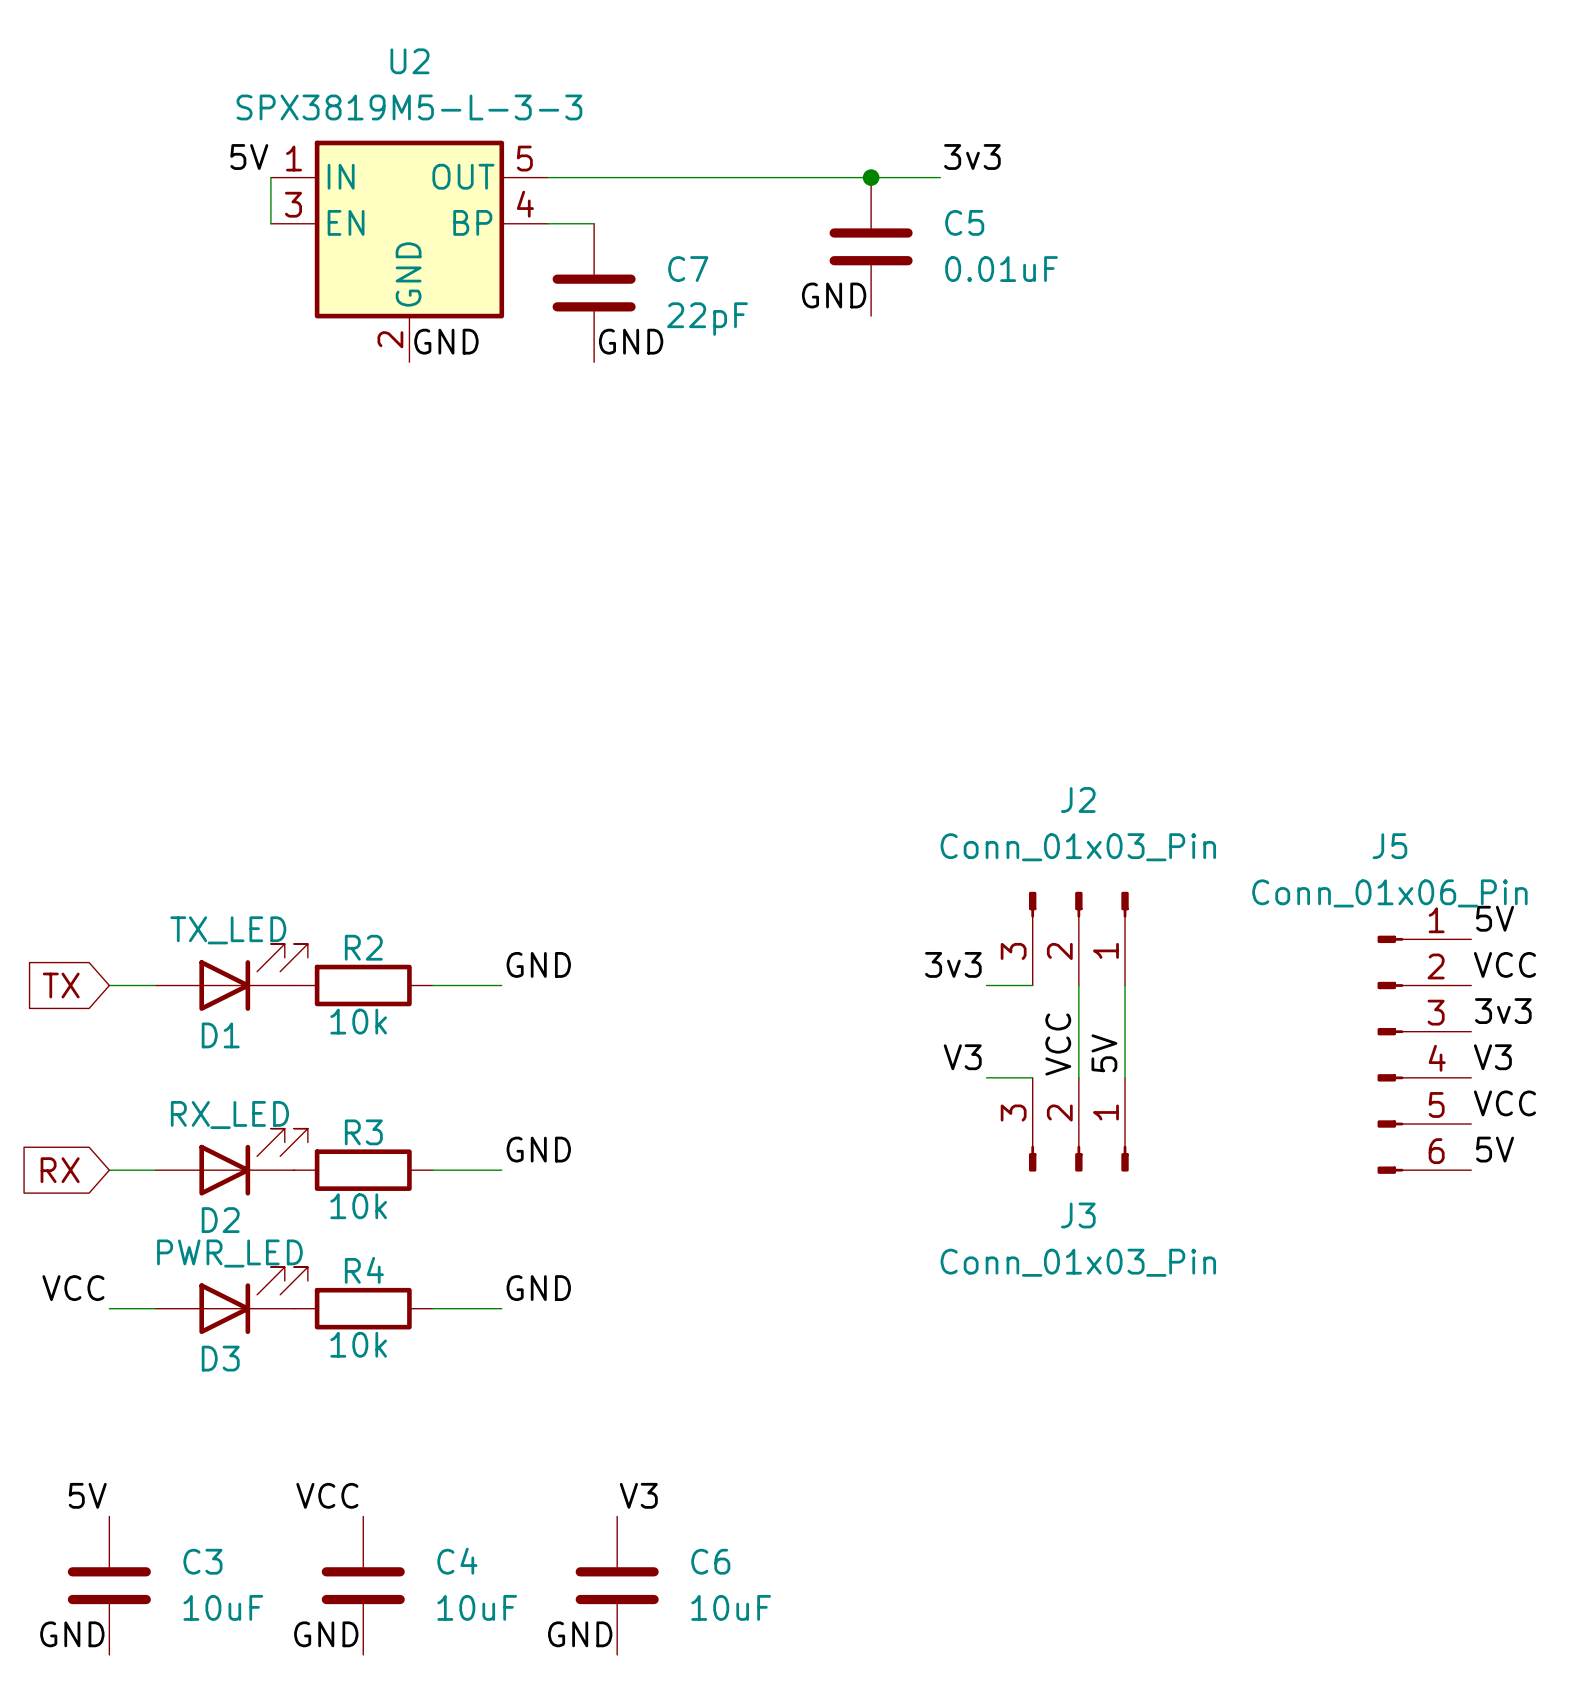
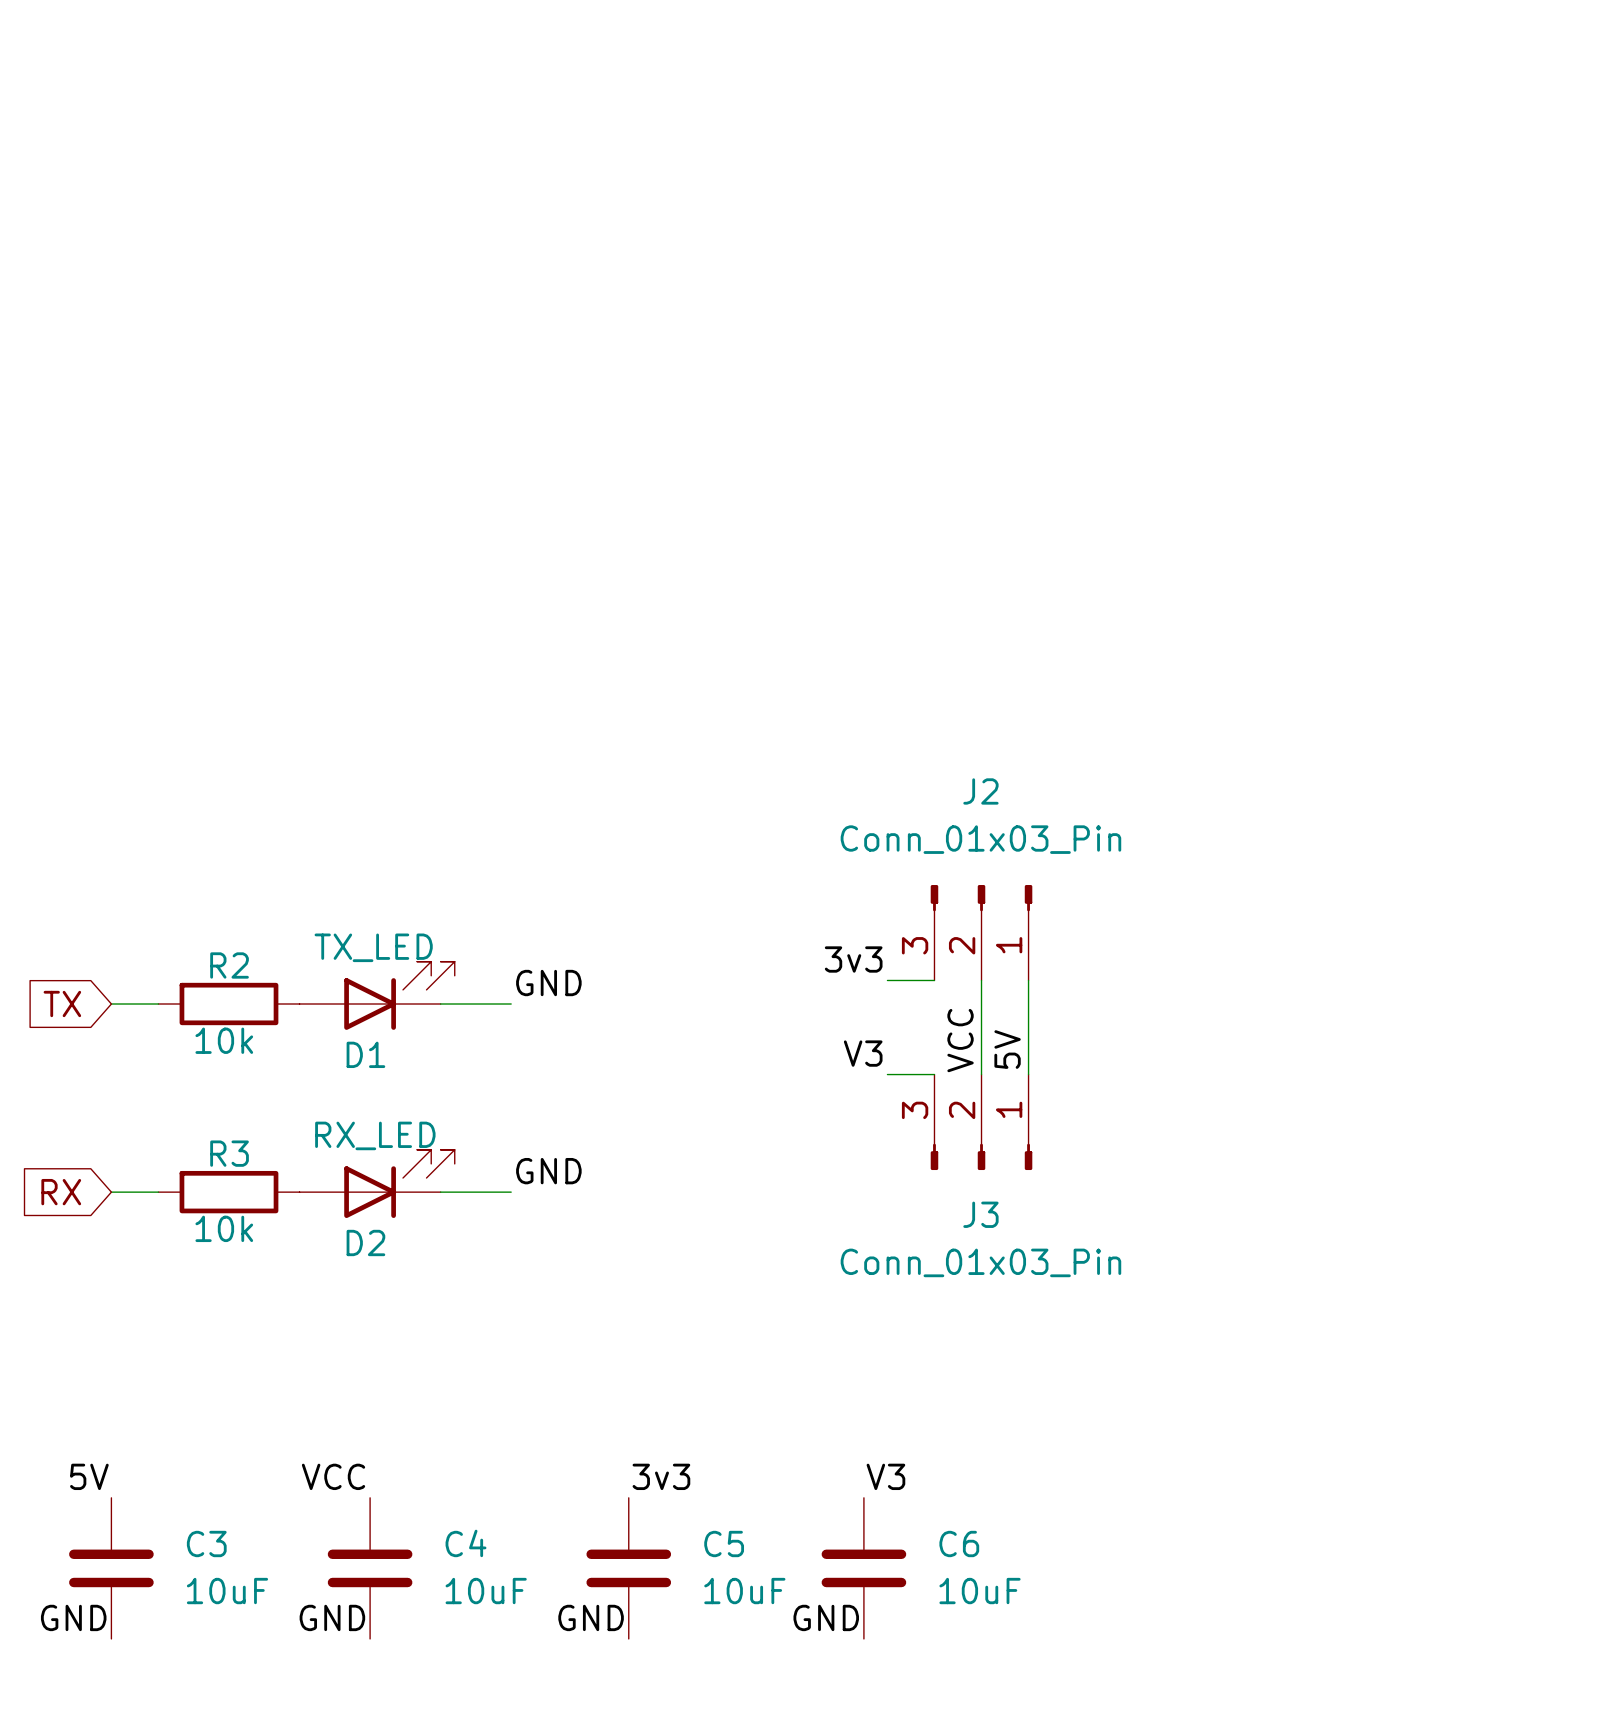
label: 5V (249, 156) -> none
label: 3v3 (972, 156) -> none
wire: (270, 177) (270, 223) -> none
wire: (547, 177) (940, 177) -> none
junction: (871, 177) -> none
wire: (547, 223) (594, 223) -> none
C5 position: (871, 246) -> (628, 1568)
U2: SPX3819M5-L-3-3 (409, 251) -> none
C5 value: 0.01uF (1001, 269) -> 10uF (744, 1591)
C7: 22pF (594, 293) -> none
label: GND (834, 295) -> none
label: GND (446, 341) -> none
label: GND (631, 341) -> none
label: 5V (1495, 918) -> none
J2 position: (1078, 938) -> (981, 932)
label position: 3v3 (953, 964) -> 3v3 (853, 959)
label: VCC (1504, 964) -> none
D1 position: (231, 977) -> (377, 995)
R2 position: (363, 985) -> (228, 1004)
wire: (986, 985) (1032, 985) -> (887, 980) (934, 980)
wire: (1078, 985) (1078, 1077) -> (981, 980) (981, 1074)
wire: (1125, 985) (1125, 1077) -> (1028, 980) (1028, 1074)
label: 3v3 (1503, 1011) -> none
label position: VCC (1058, 1044) -> VCC (960, 1040)
label position: 5V (1104, 1053) -> 5V (1007, 1049)
J5: Conn_01x06_Pin (1424, 1054) -> none
label position: V3 (962, 1057) -> V3 (863, 1053)
label: V3 (1492, 1057) -> none
wire: (986, 1077) (1032, 1077) -> (887, 1074) (934, 1074)
label: VCC (1504, 1103) -> none
J3 position: (1078, 1124) -> (981, 1122)
label: 5V (1495, 1149) -> none
D2 position: (231, 1162) -> (377, 1183)
R3 position: (363, 1170) -> (228, 1192)
label: VCC (73, 1288) -> none
label: GND (538, 1288) -> none
D3: PWR_LED (231, 1300) -> none
wire: (109, 1308) (155, 1308) -> none
R4: 10k (363, 1308) -> none
wire: (432, 1308) (501, 1308) -> none
label: none -> 3v3 (661, 1476)
label: none -> V3 (885, 1476)
label position: 5V (87, 1495) -> 5V (89, 1476)
label position: VCC (327, 1495) -> VCC (333, 1476)
label: V3 (638, 1495) -> none
C3 position: (109, 1585) -> (111, 1568)
C4 position: (363, 1585) -> (370, 1568)
C6 position: (617, 1585) -> (863, 1568)
label: none -> GND (826, 1617)
label position: GND (72, 1634) -> GND (73, 1617)
label position: GND (326, 1634) -> GND (332, 1617)
label position: GND (580, 1634) -> GND (591, 1617)

